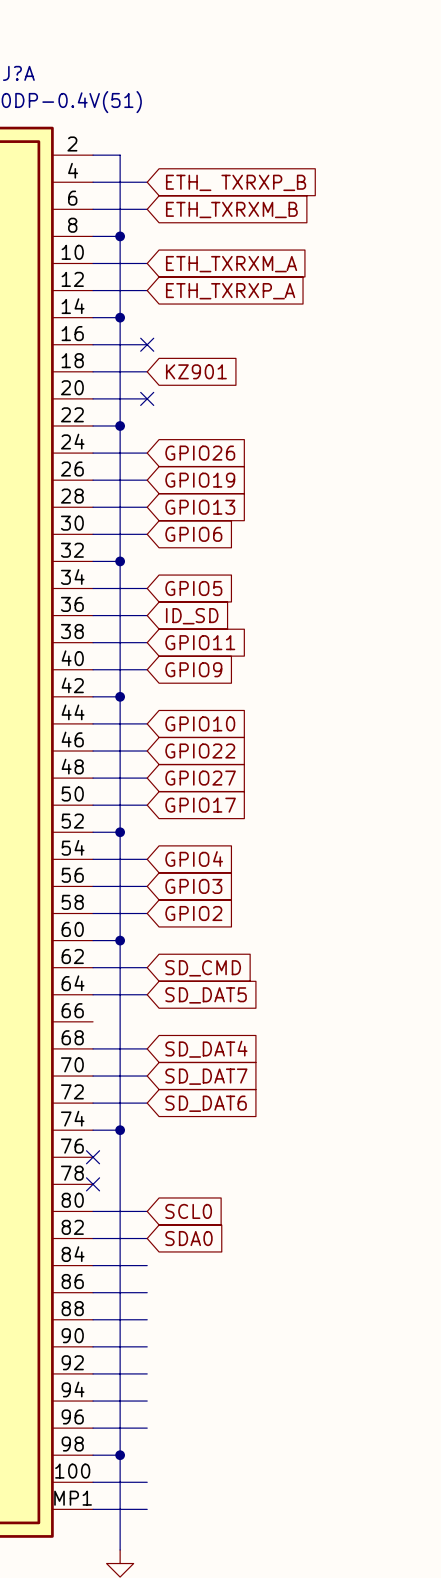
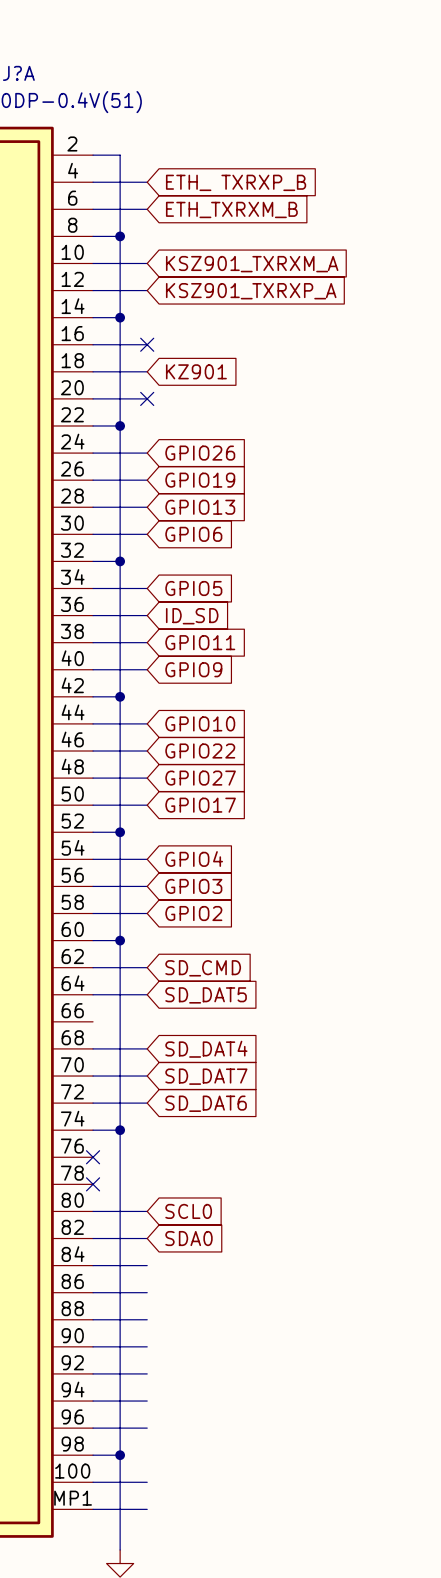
global label: ETH_TXRXM_A (231, 264) -> KSZ901_TXRXM_A (252, 264)
global label: ETH_TXRXP_A (230, 291) -> KSZ901_TXRXP_A (251, 291)

